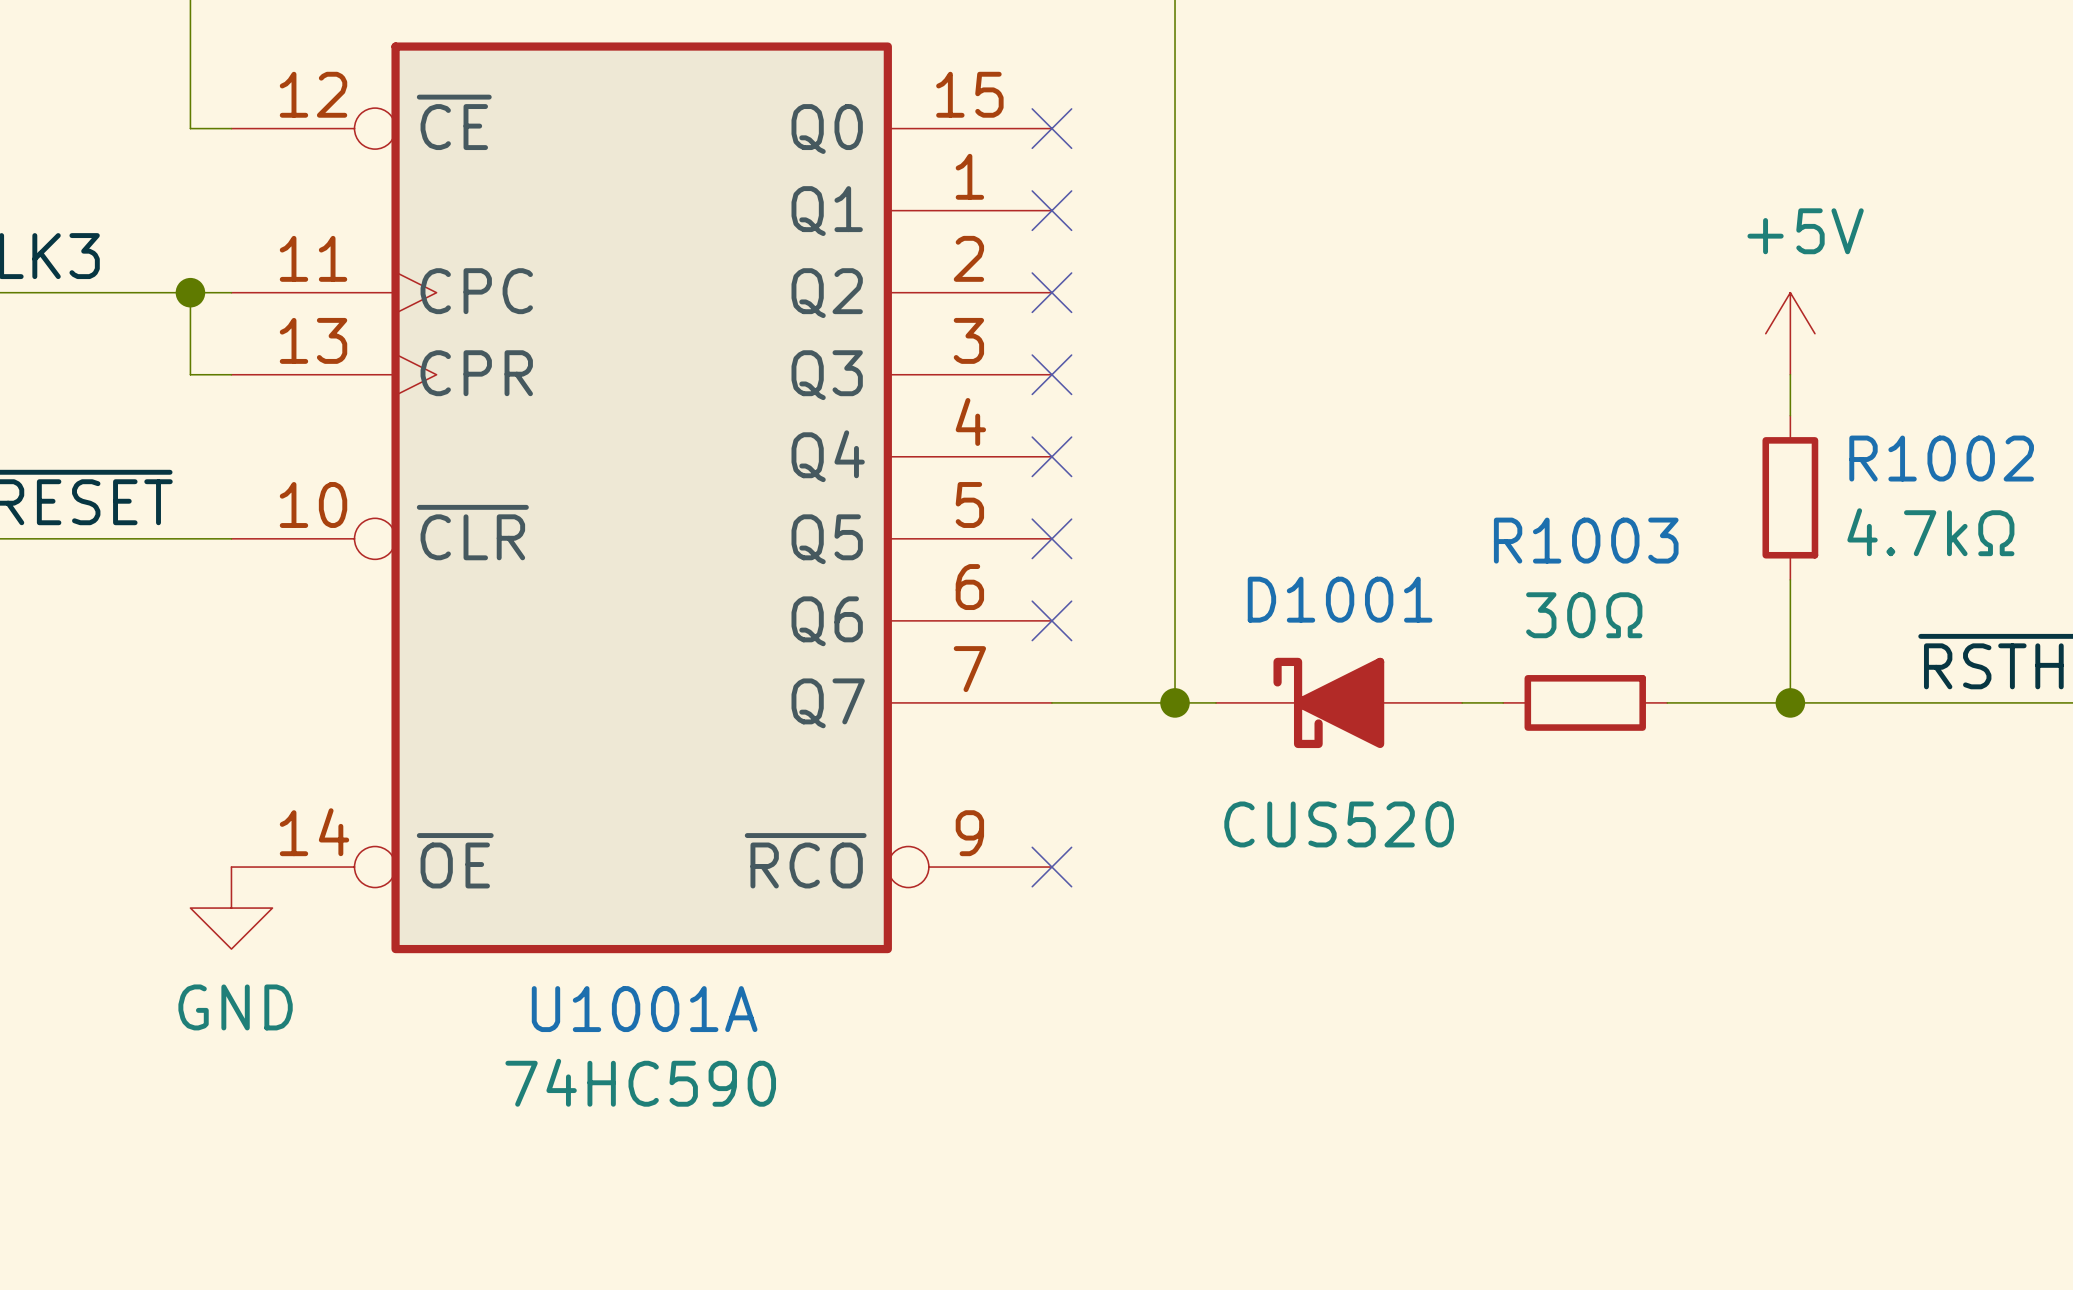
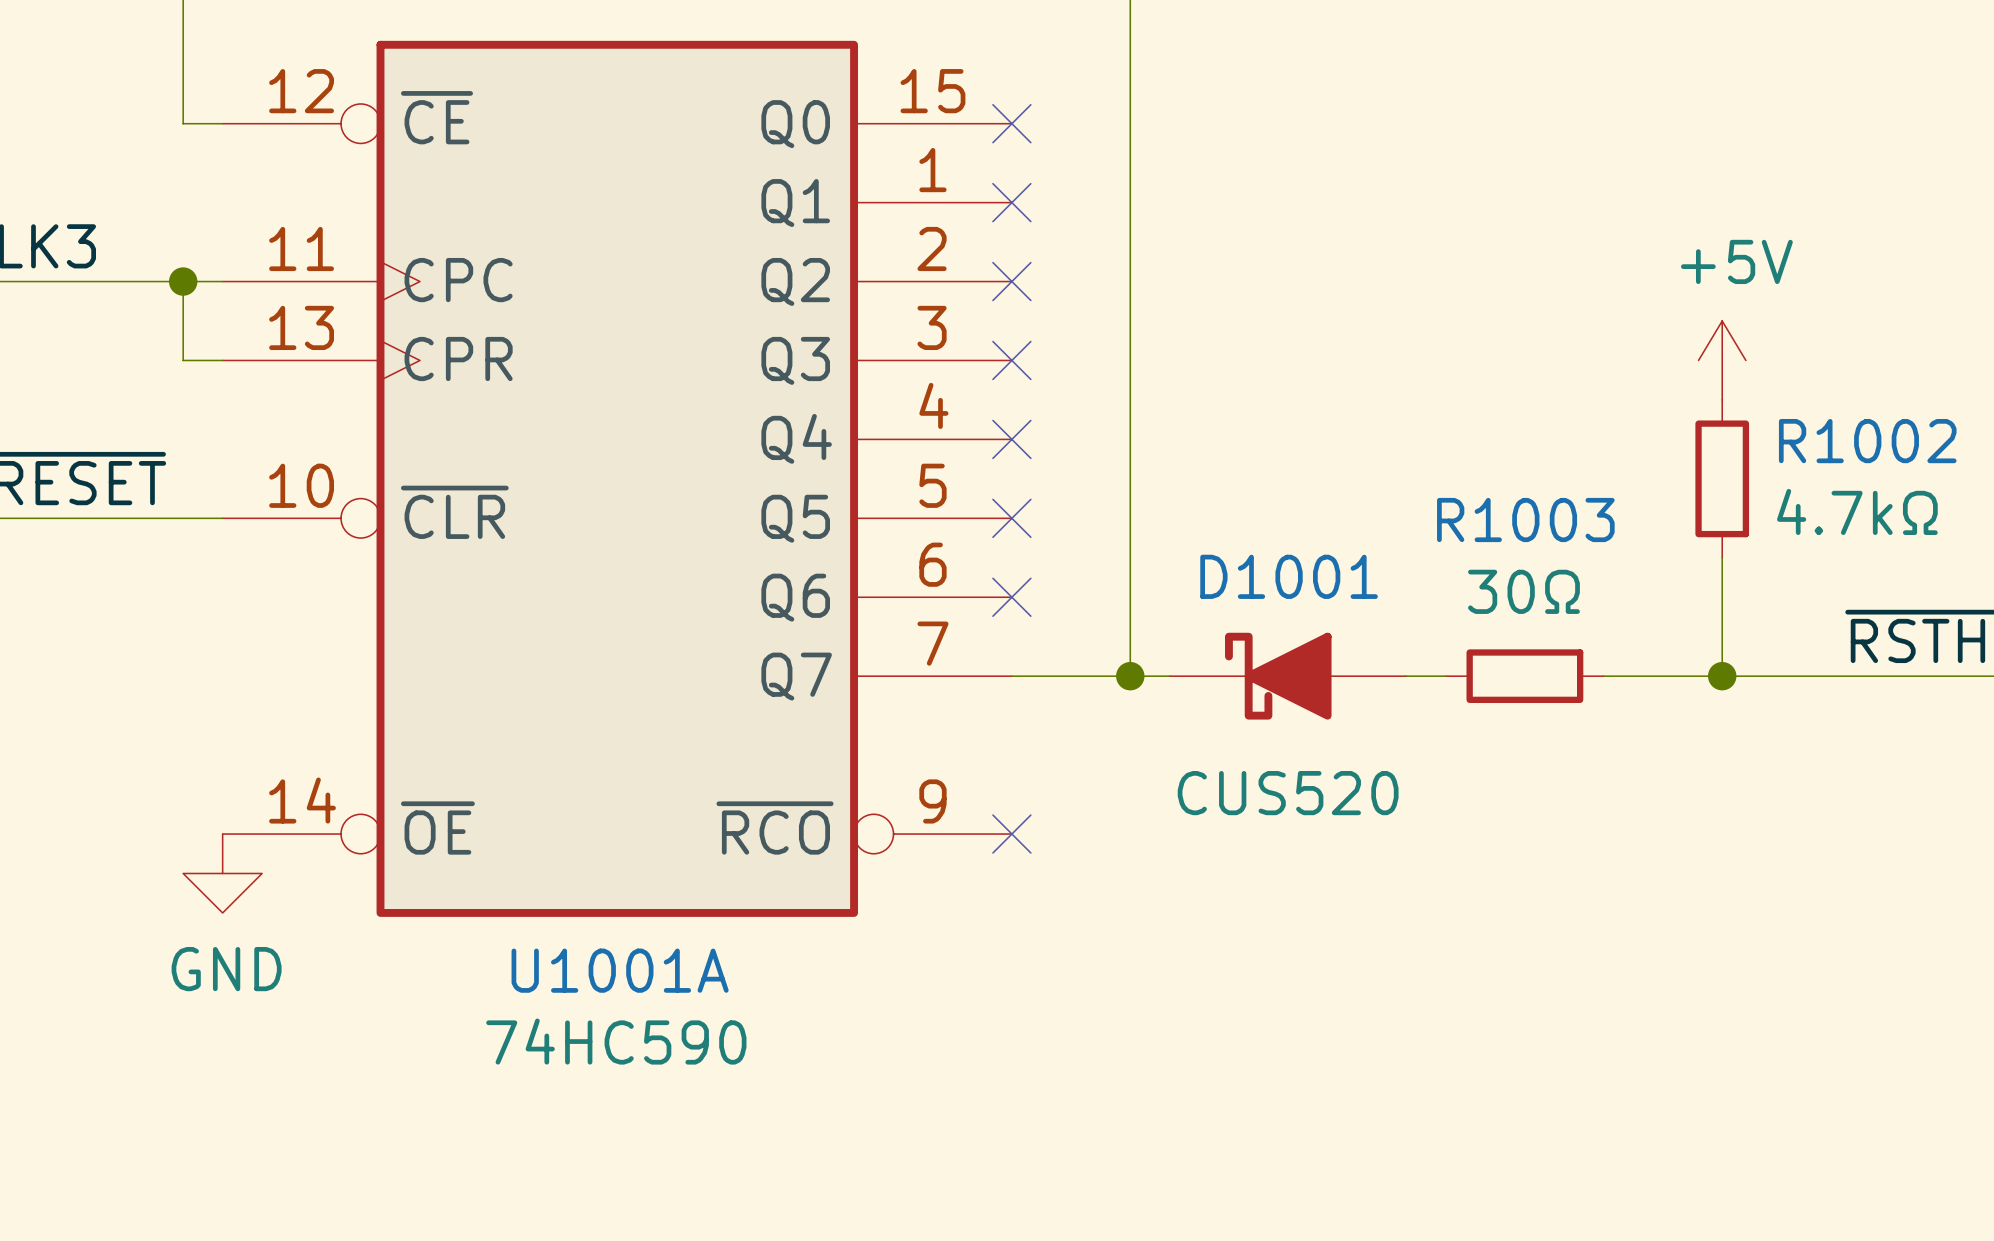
power symbol position: +5V (1790, 333) -> +5V (1722, 360)

